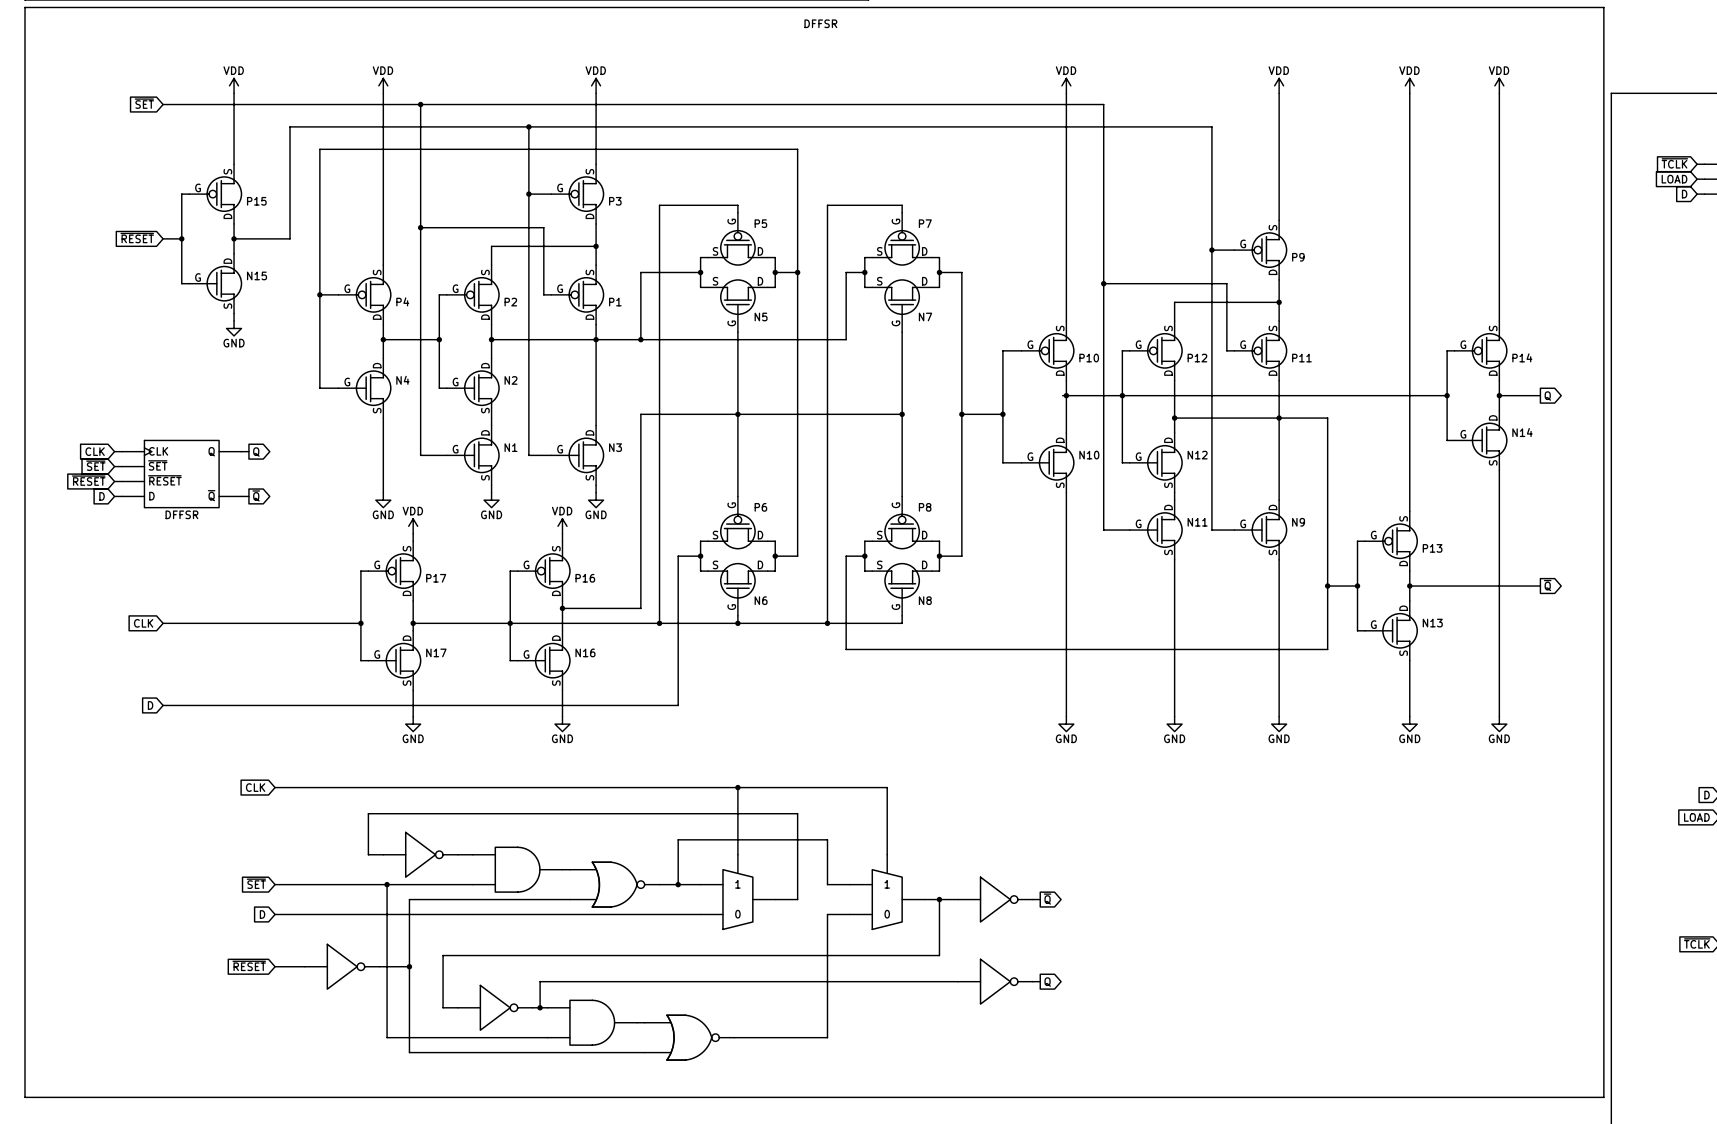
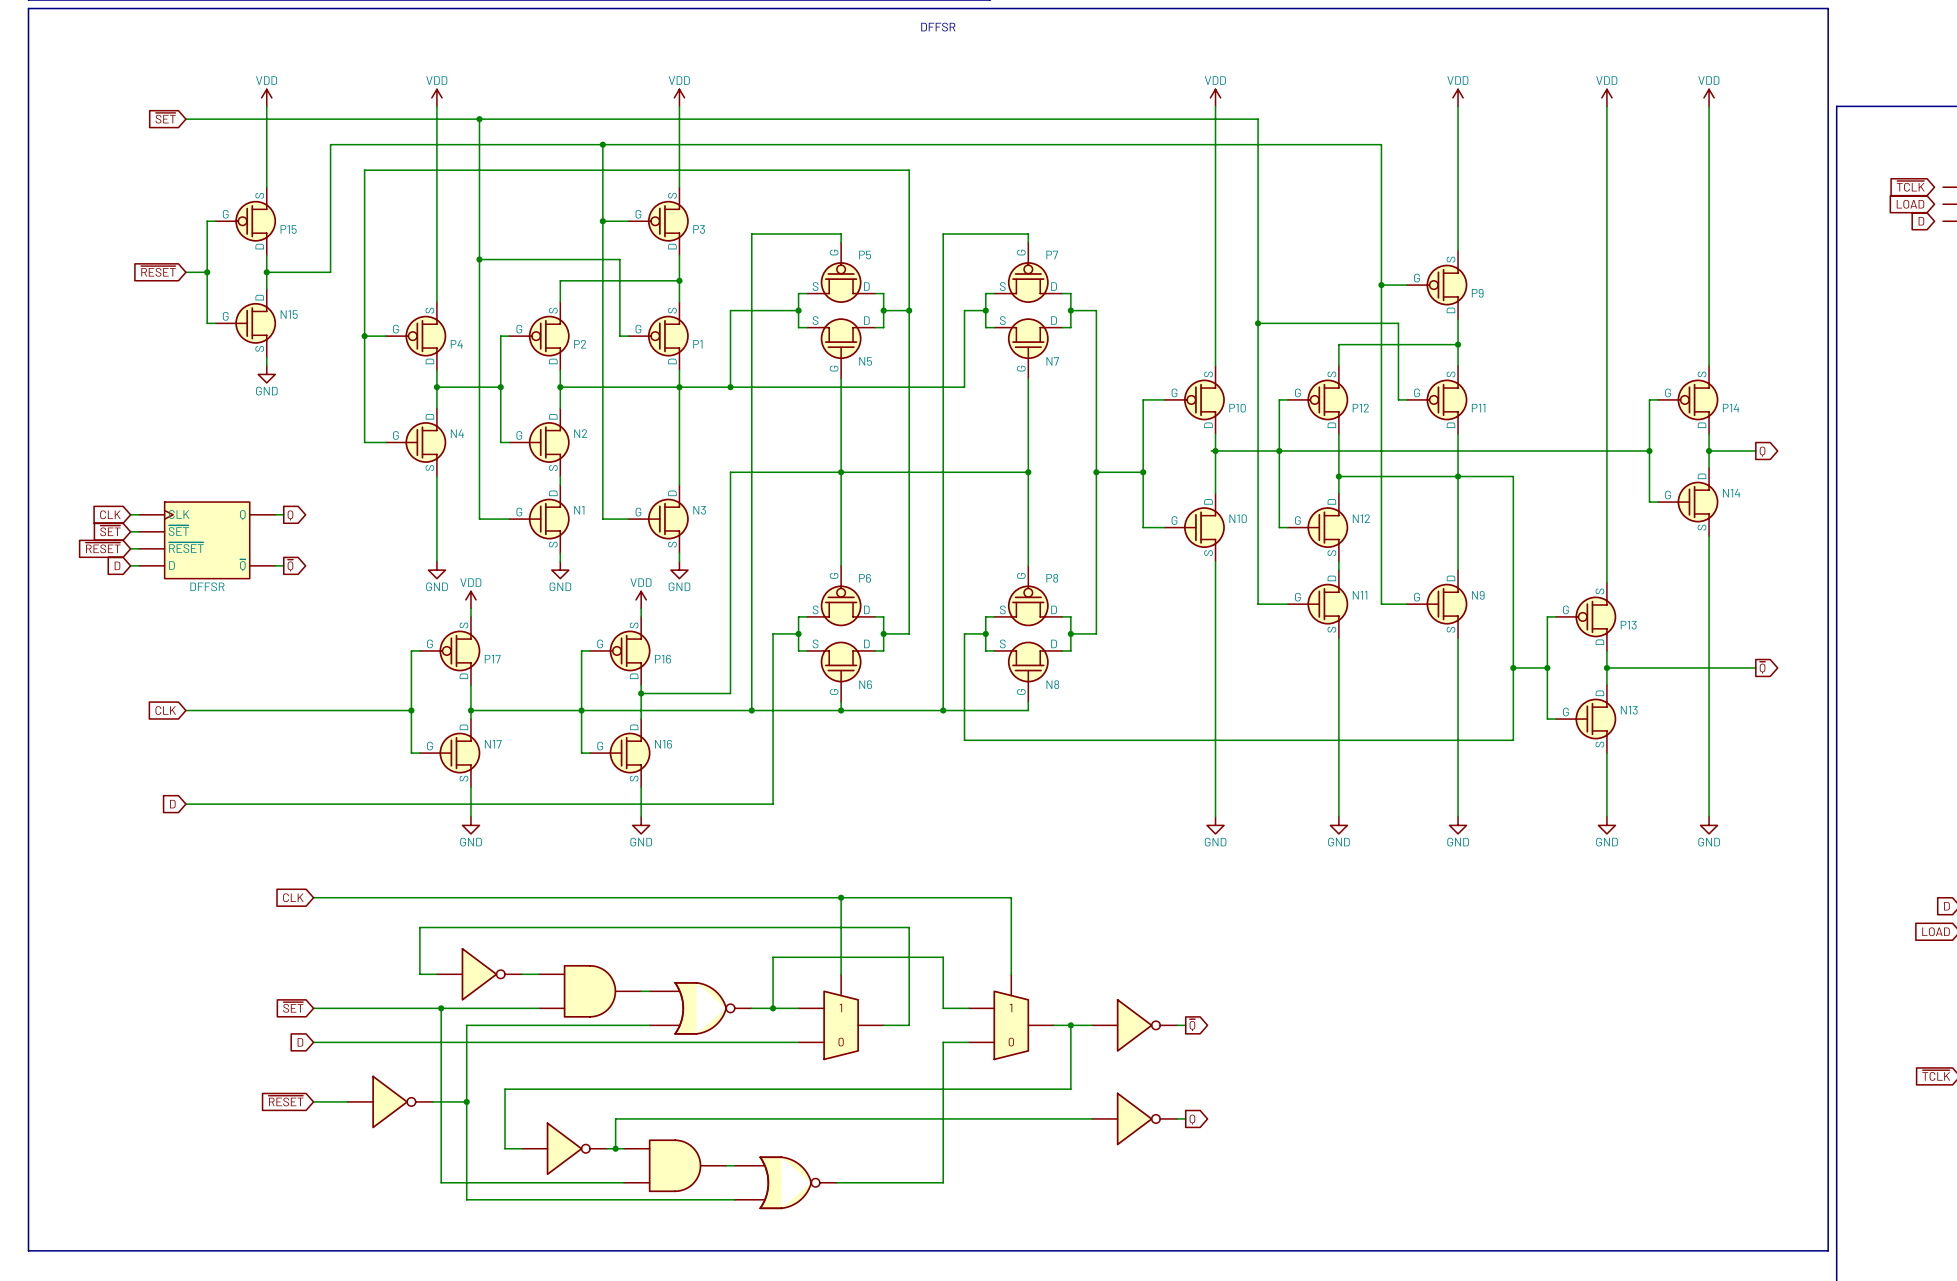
wire: (1697, 164) (1704, 164) -> none
wire: (1697, 179) (1704, 179) -> none
wire: (1697, 194) (1704, 194) -> none

